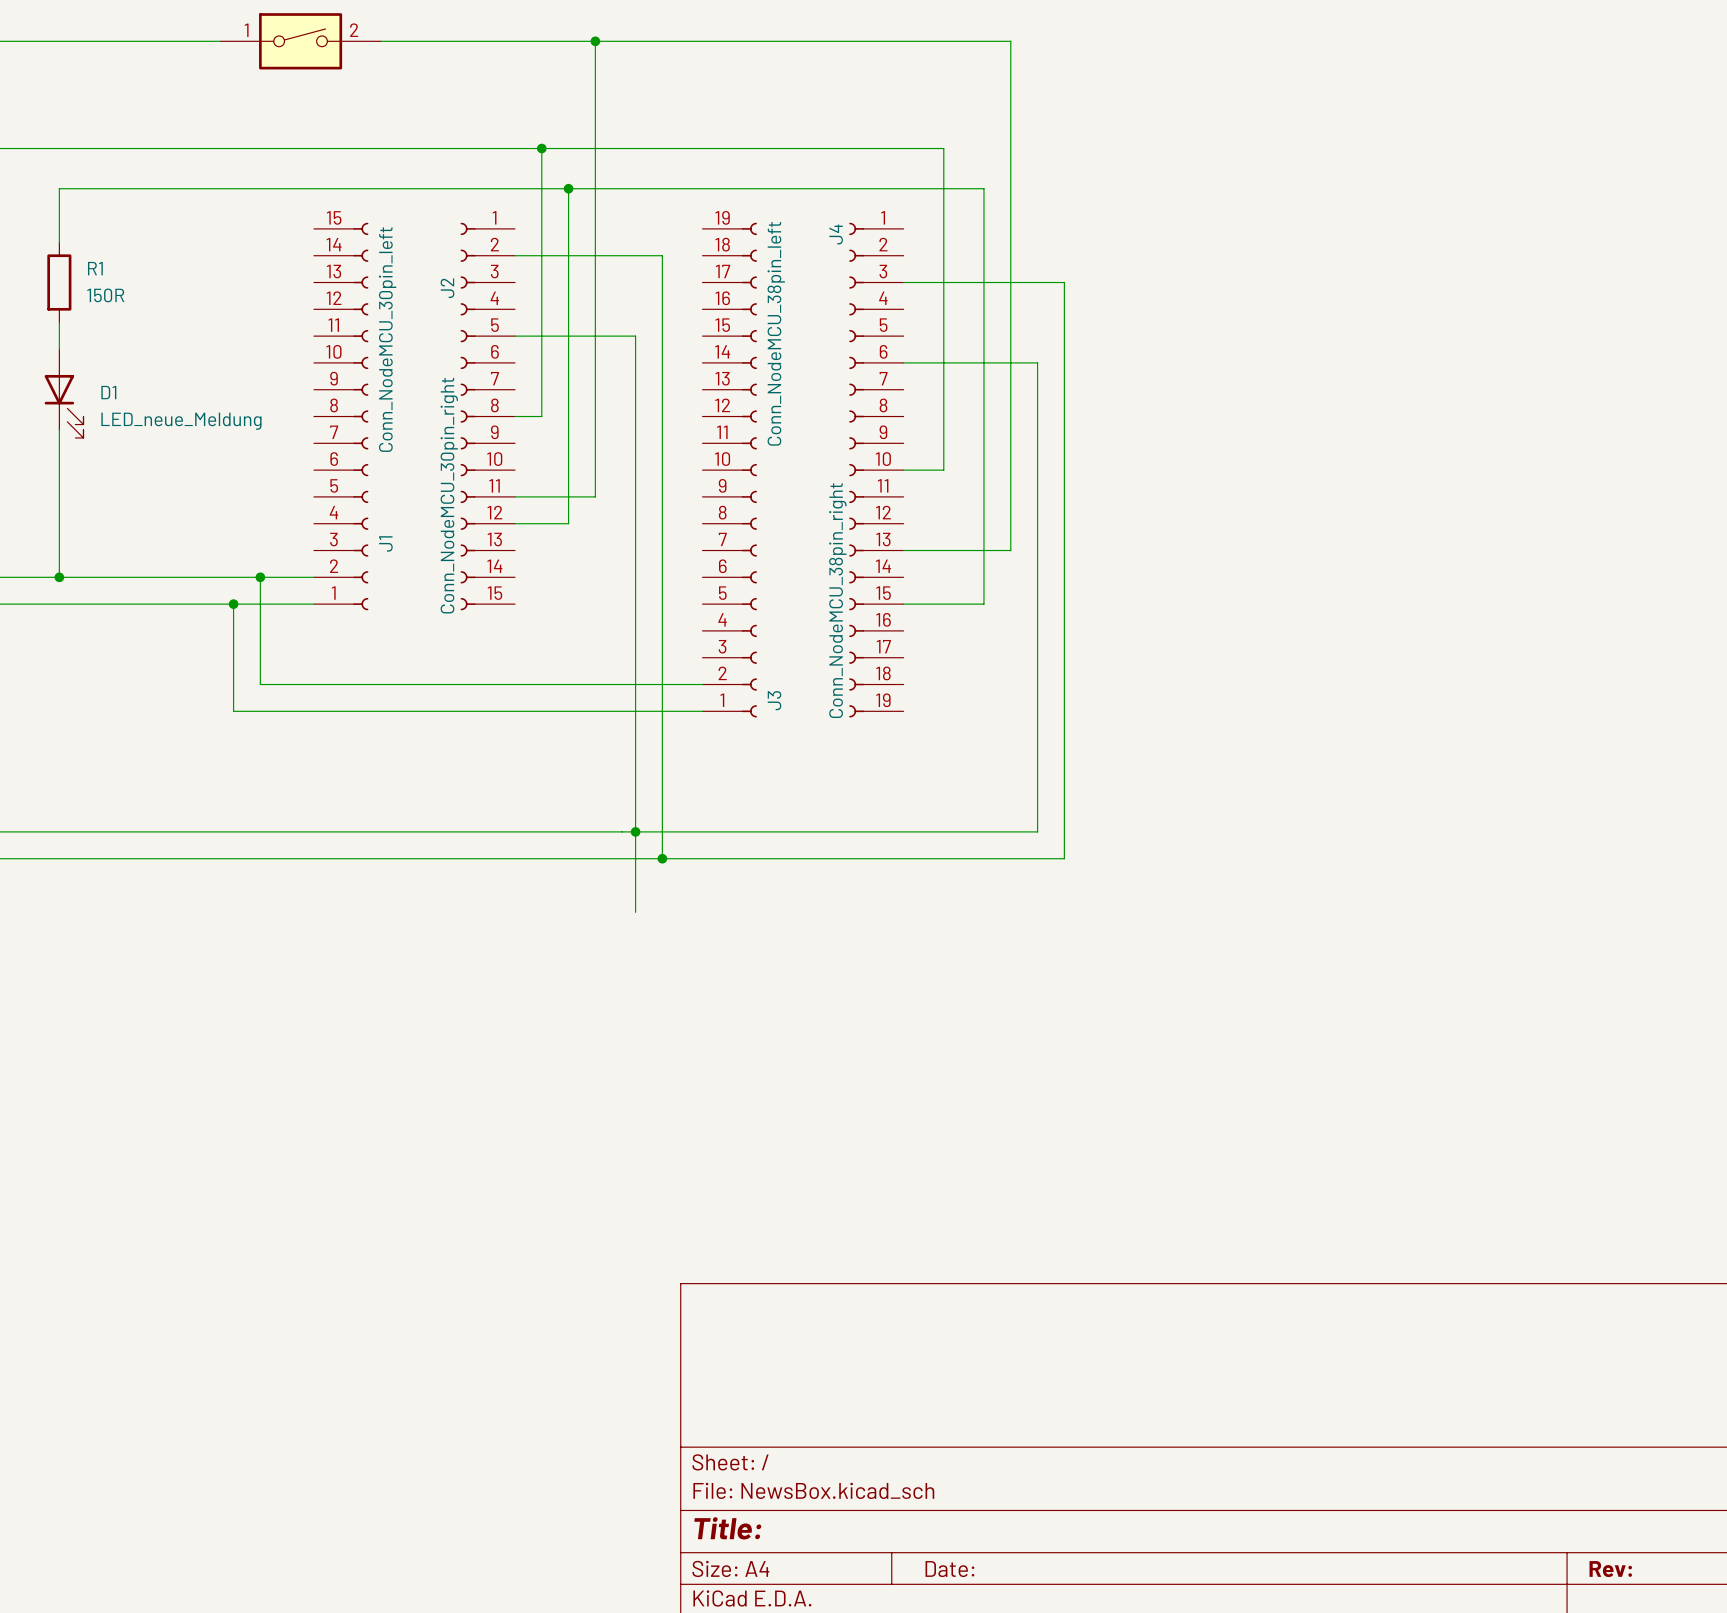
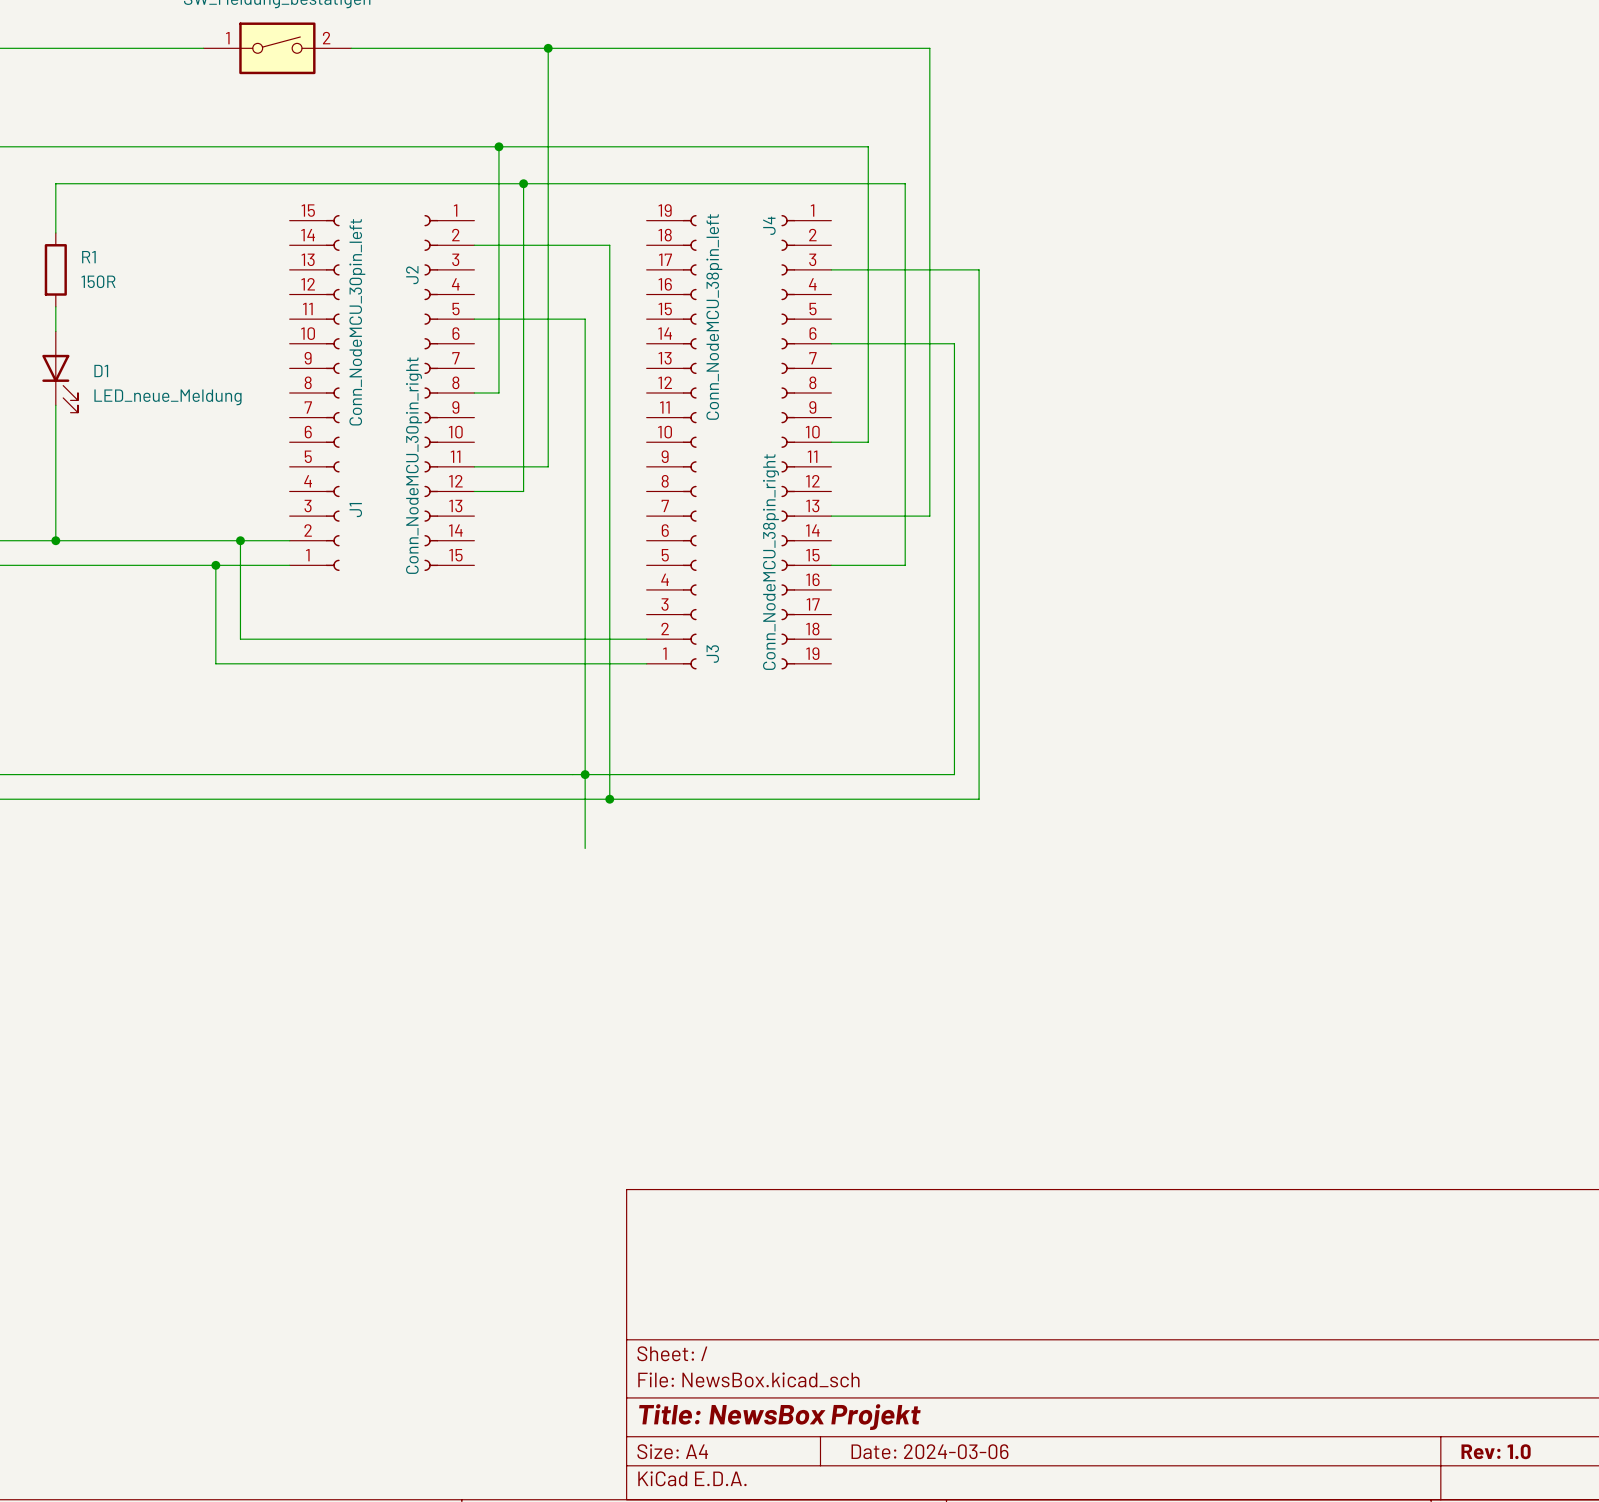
title block: Title: (727, 1528) -> Title: NewsBox Projekt (779, 1417)
title block: Date: (949, 1569) -> Date: 2024-03-06 (930, 1451)
title block: Rev: (1610, 1569) -> Rev: 1.0 (1496, 1451)

